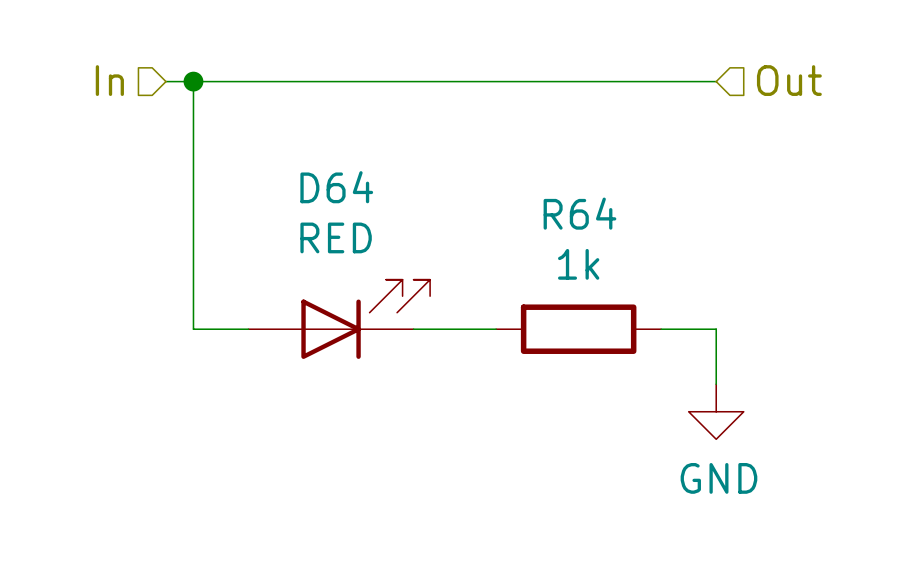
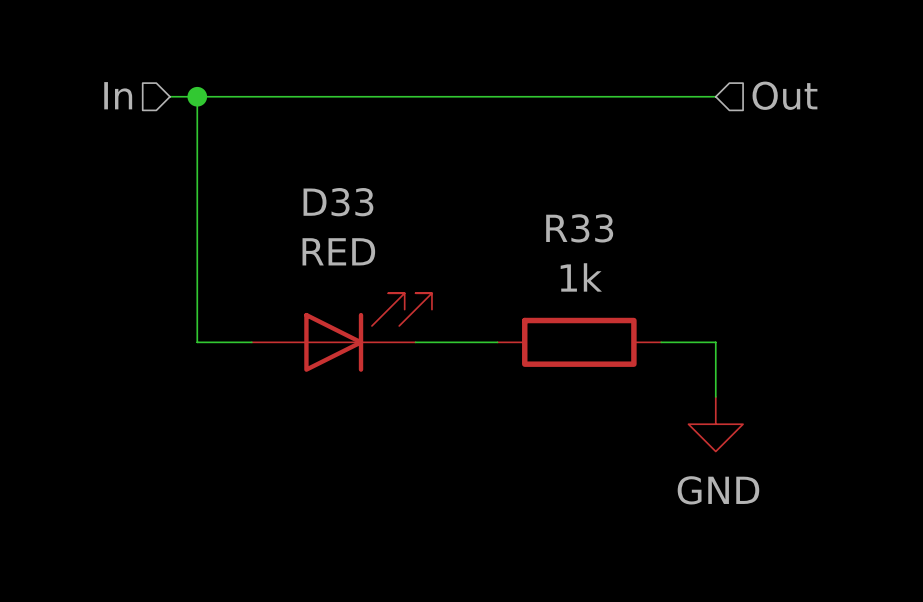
D64 name: D64 (336, 187) -> D33 (338, 202)
R64 name: R64 (579, 213) -> R33 (579, 228)

